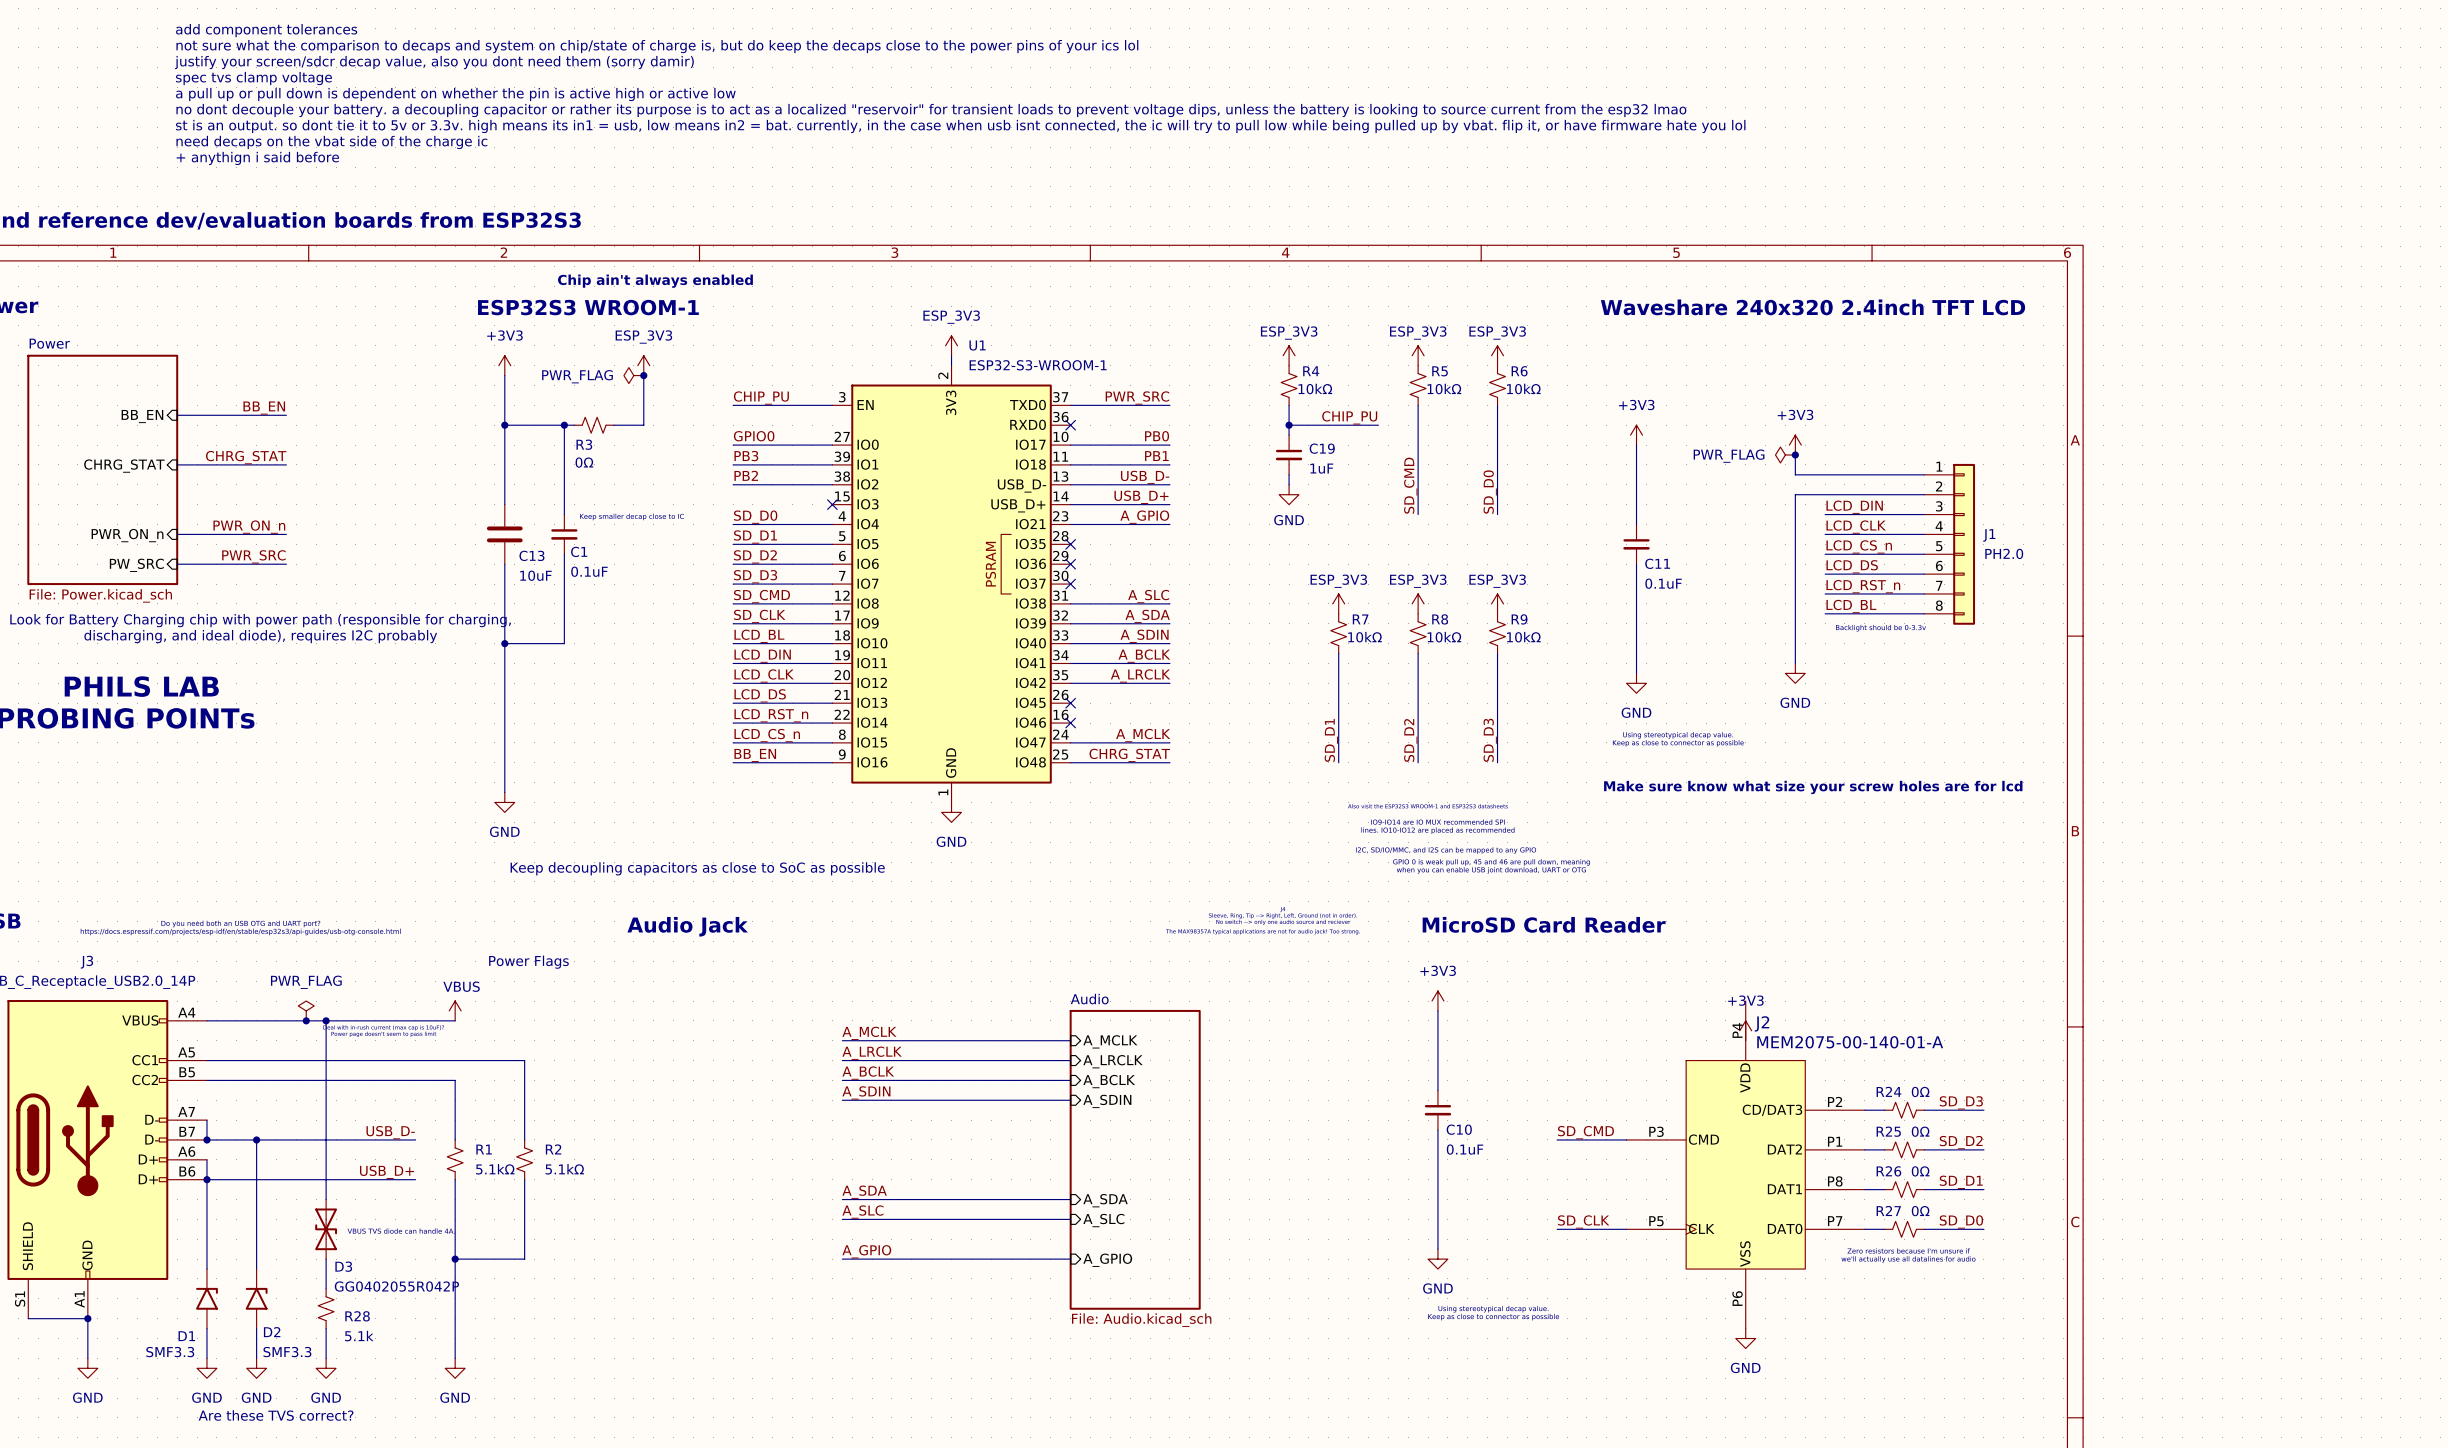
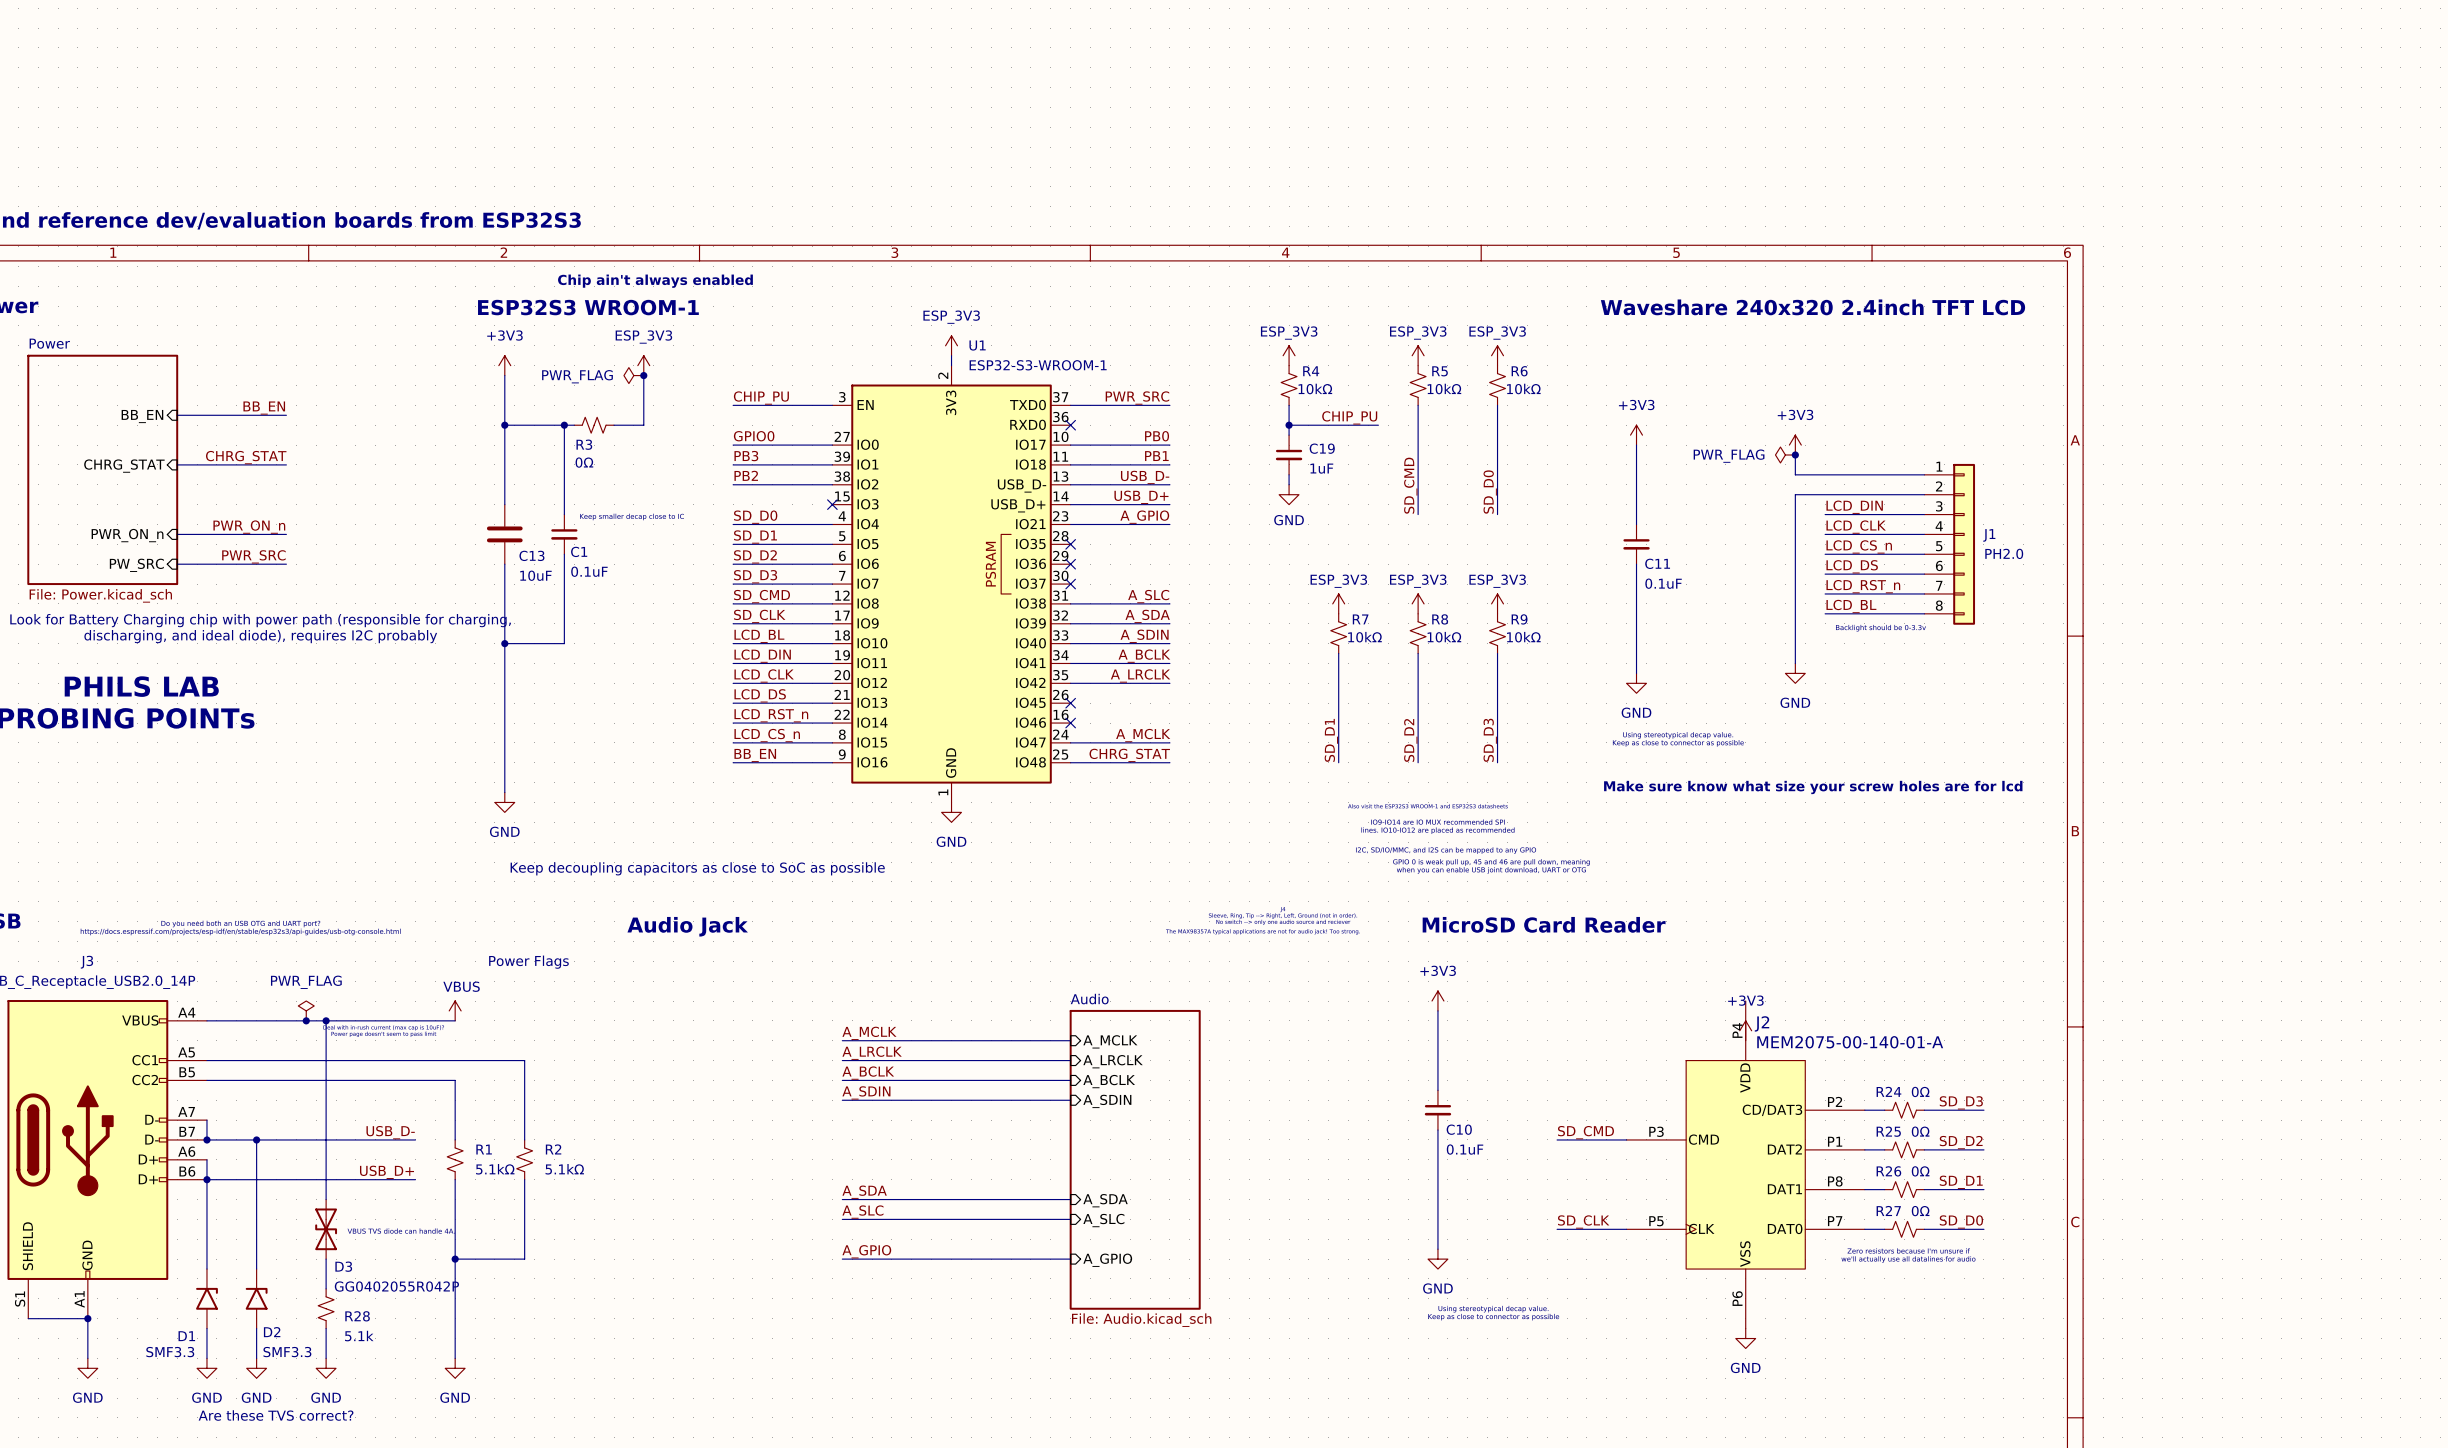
text: add component tolerances (266, 30) -> none
text: not sure what the comparison to decaps and system on chip/state of charge is, but do keep the decaps close to the power pins of your ics lol (657, 46) -> none
text: justify your screen/sdcr decap value, also you dont need them (sorry damir) (434, 62) -> none
text: spec tvs clamp voltage (253, 78) -> none
text: a pull up or pull down is dependent on whether the pin is active high or active low (455, 94) -> none
text: no dont decouple your battery. a decoupling capacitor or rather its purpose is to act as a localized "reservoir" for transient loads to prevent voltage dips, unless the battery is looking to source current from the esp32 lmao (931, 110) -> none
text: st is an output. so dont tie it to 5v or 3.3v. high means its in1 = usb, low means in2 = bat. currently, in the case when usb isnt connected, the ic will try to pull low while being pulled up by vbat. flip it, or have firmware hate you lol (960, 126) -> none
text: need decaps on the vbat side of the charge ic (331, 142) -> none
text: + anythign i said before (257, 158) -> none

